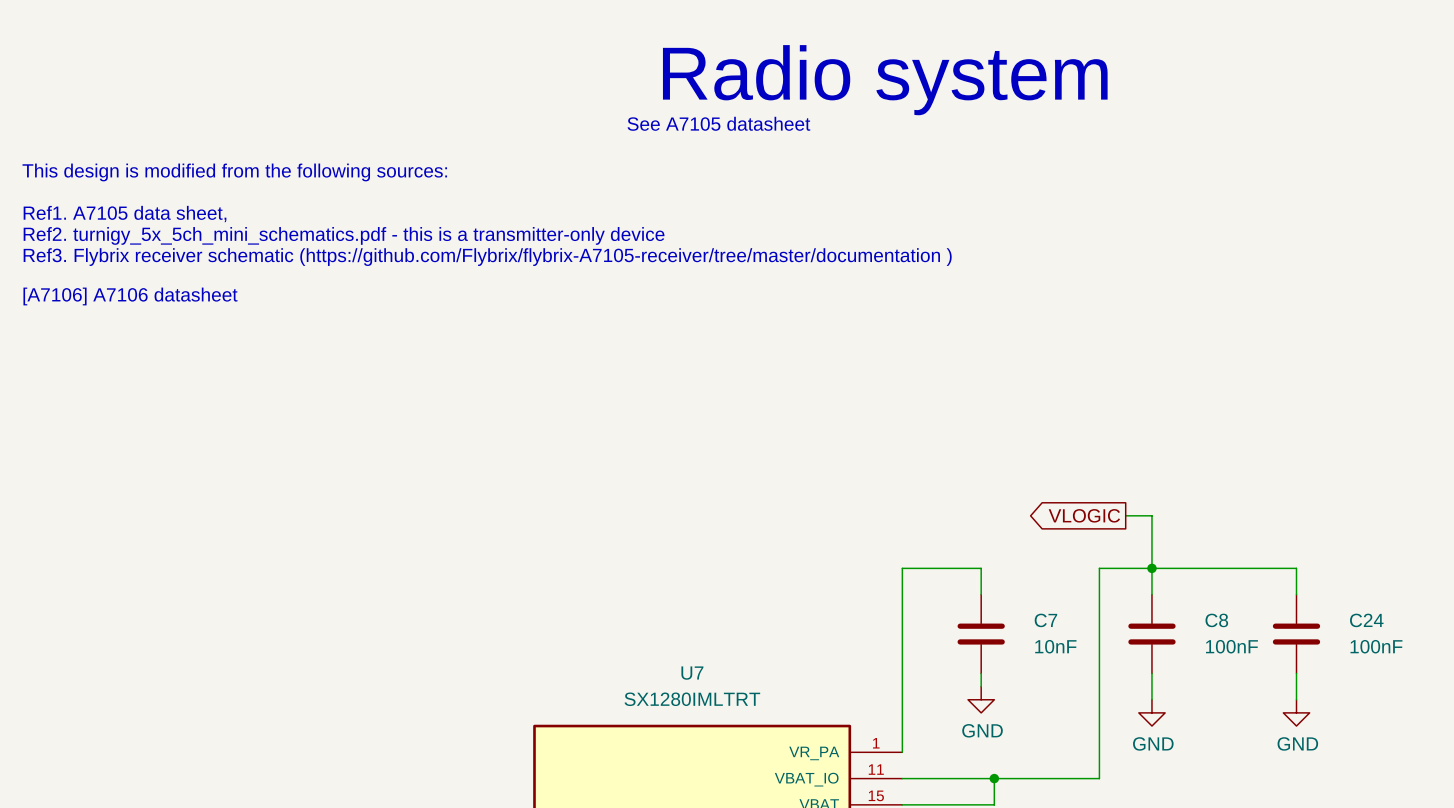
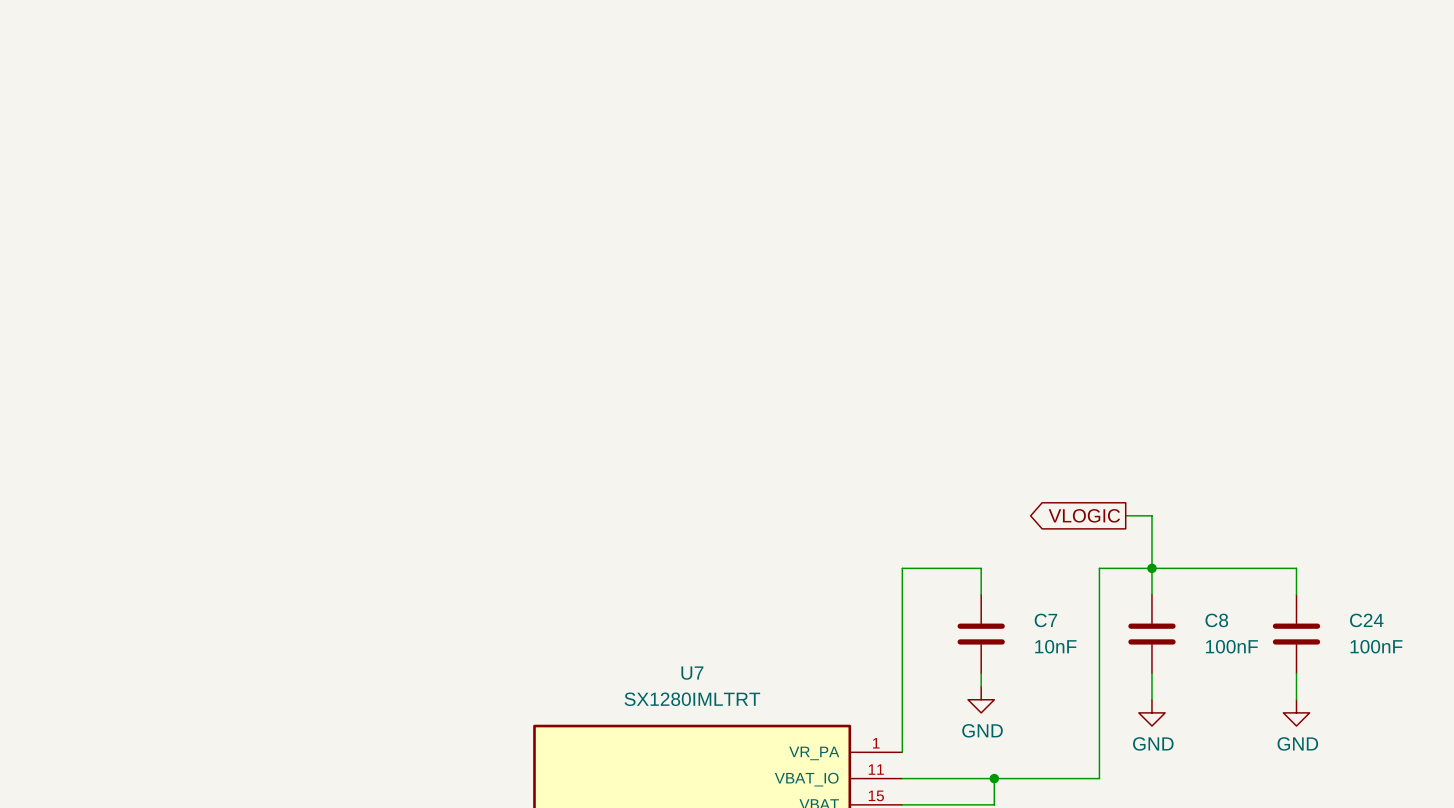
text: Radio system (885, 80) -> none
text: See A7105 datasheet (718, 123) -> none
text: This design is modified from the following sources: (234, 172) -> none
text: Ref1. A7105 data sheet, (125, 214) -> none
text: Ref2. turnigy_5x_5ch_mini_schematics.pdf - this is a transmitter-only device (344, 235) -> none
text: Ref3. Flybrix receiver schematic (https://github.com/Flybrix/flybrix-A7105-receiver/tree/master/documentation ) (487, 257) -> none
text: [A7106] A7106 datasheet (130, 296) -> none

